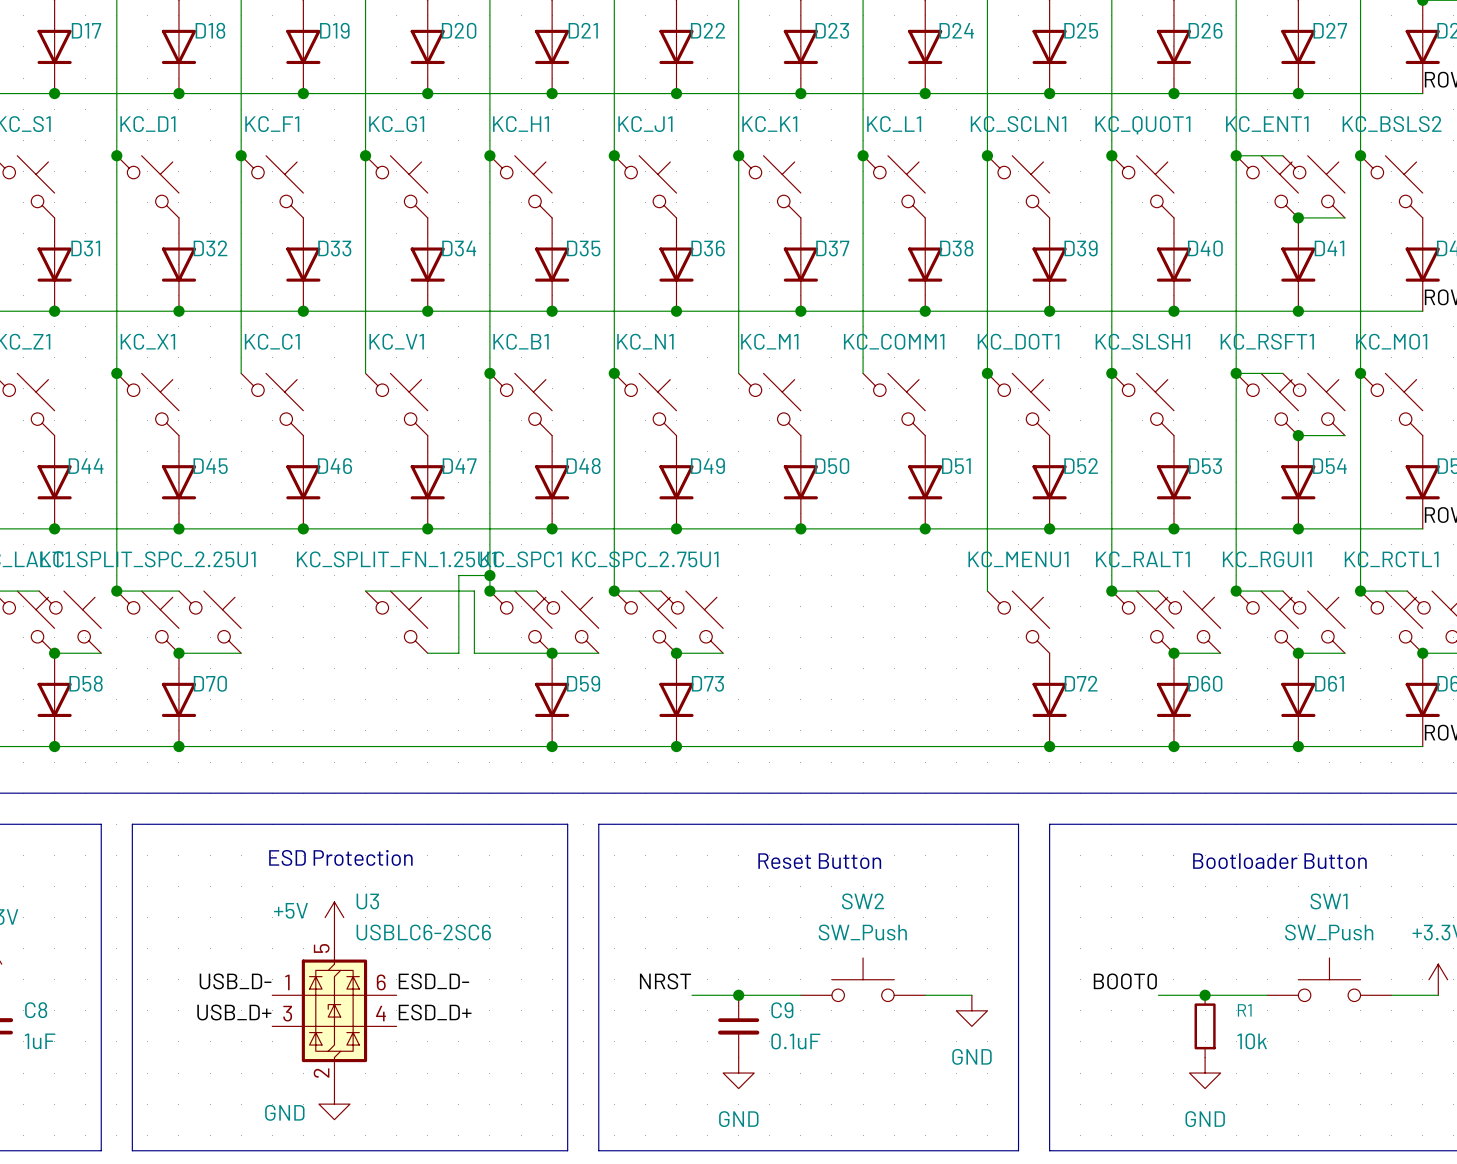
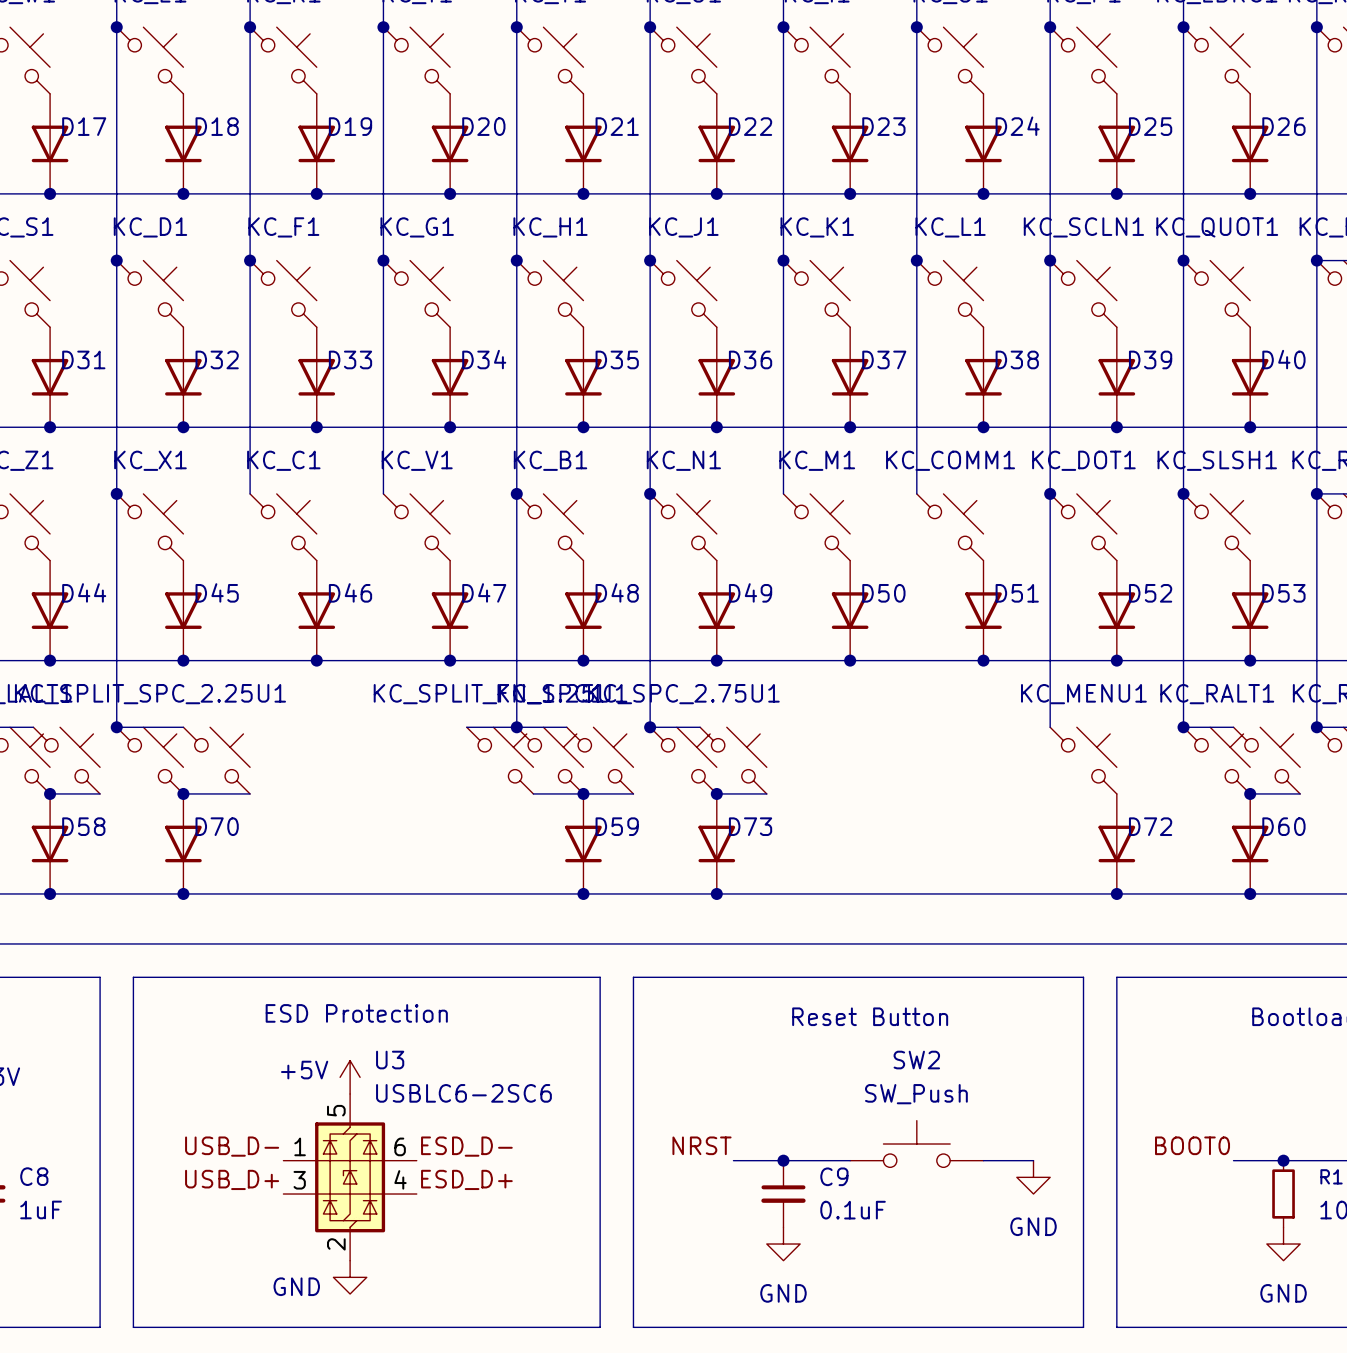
wire: (489, 575) (458, 575) (458, 653) (427, 653) -> none
junction: (489, 575) -> none
wire: (365, 591) (443, 591) -> none
wire: (474, 591) (474, 653) (505, 653) -> (500, 727) (516, 727)
KC_SPLIT_FN_1.25U1 position: (396, 622) -> (500, 760)

